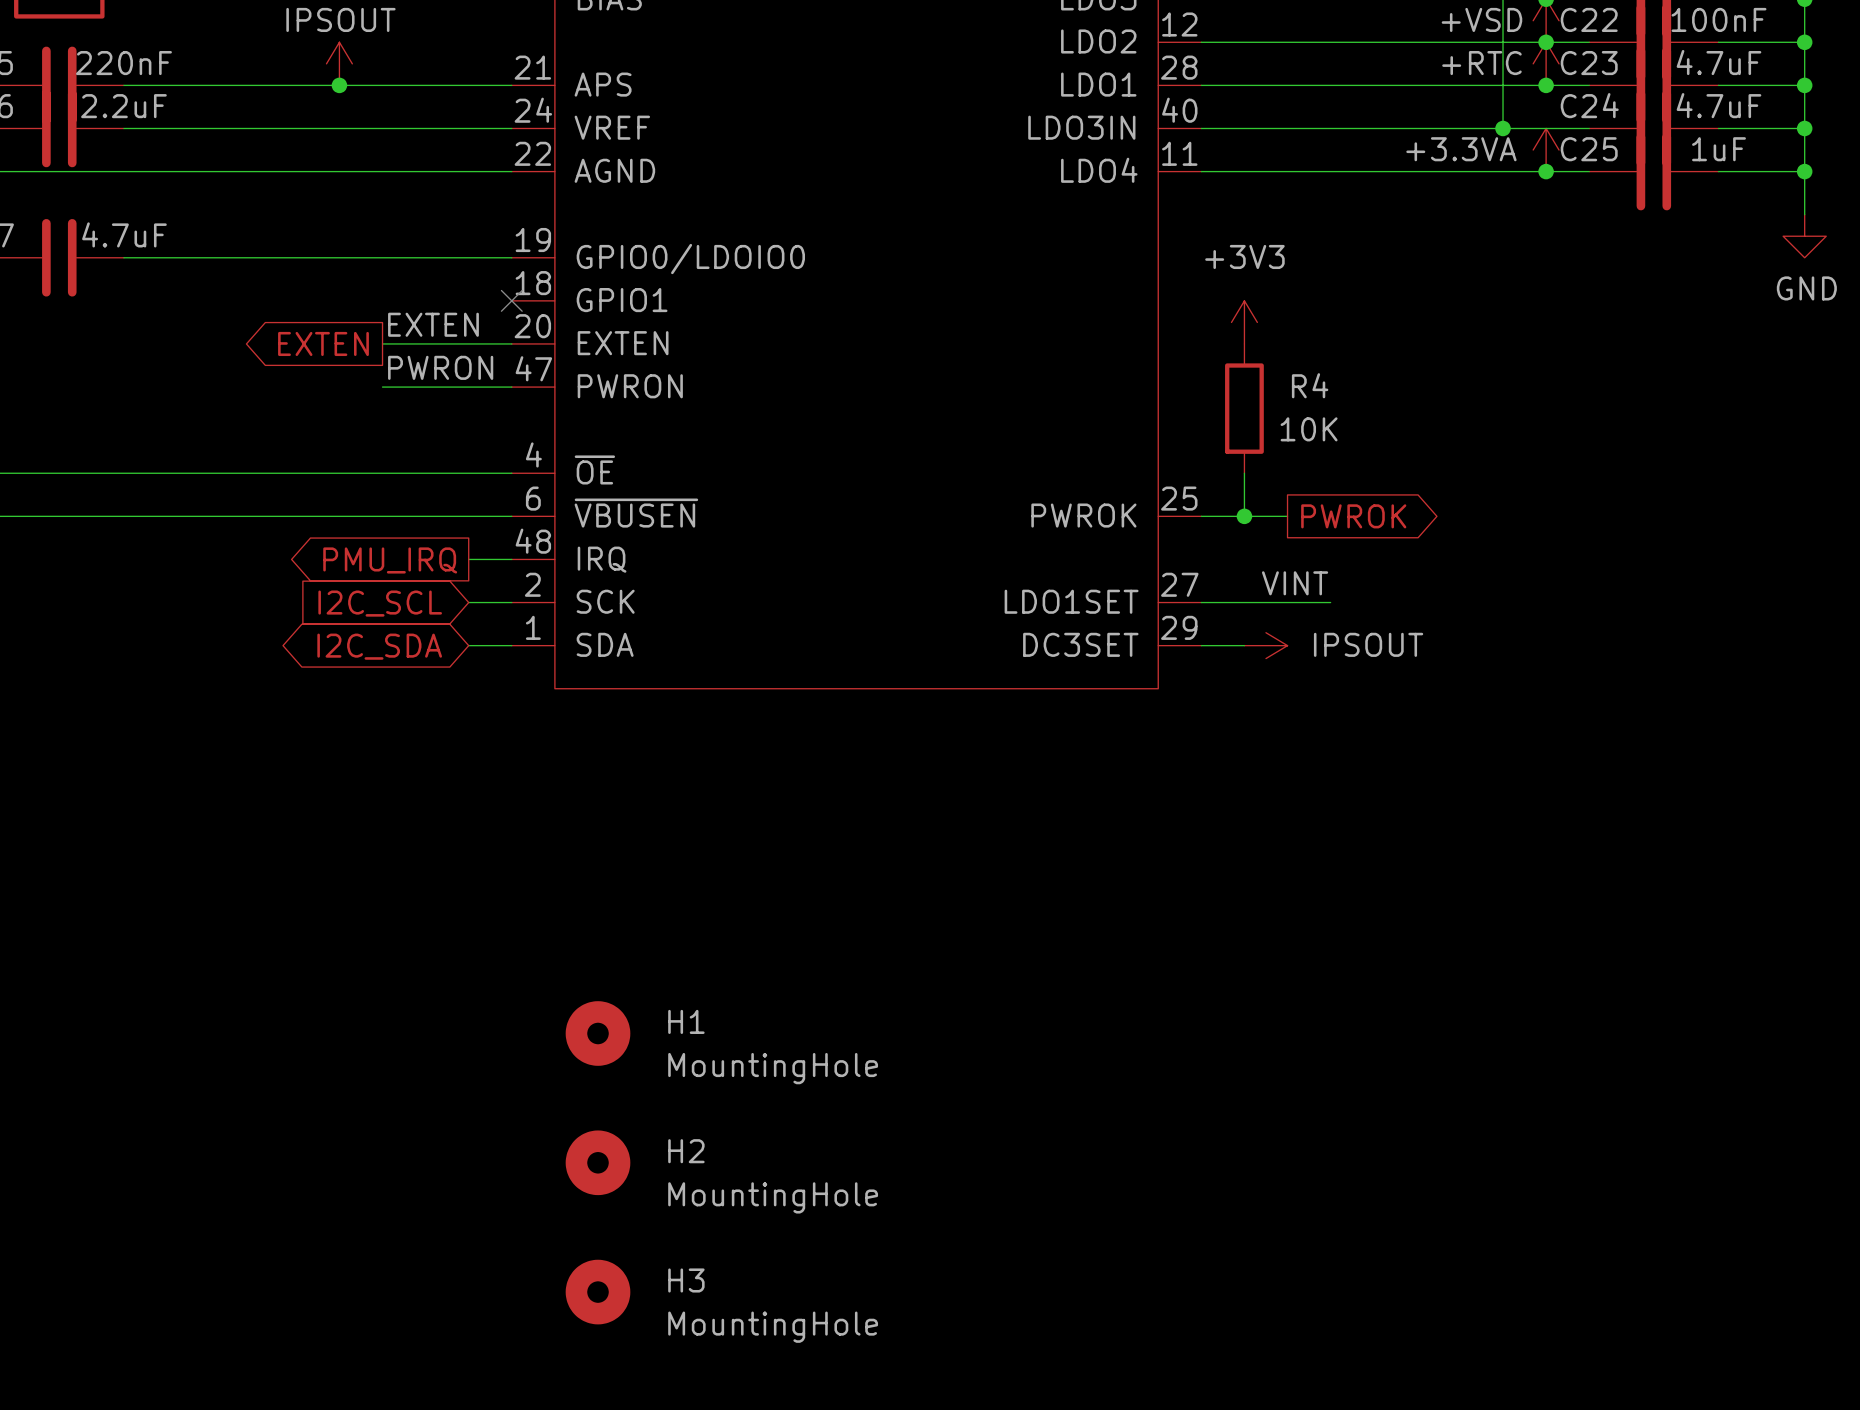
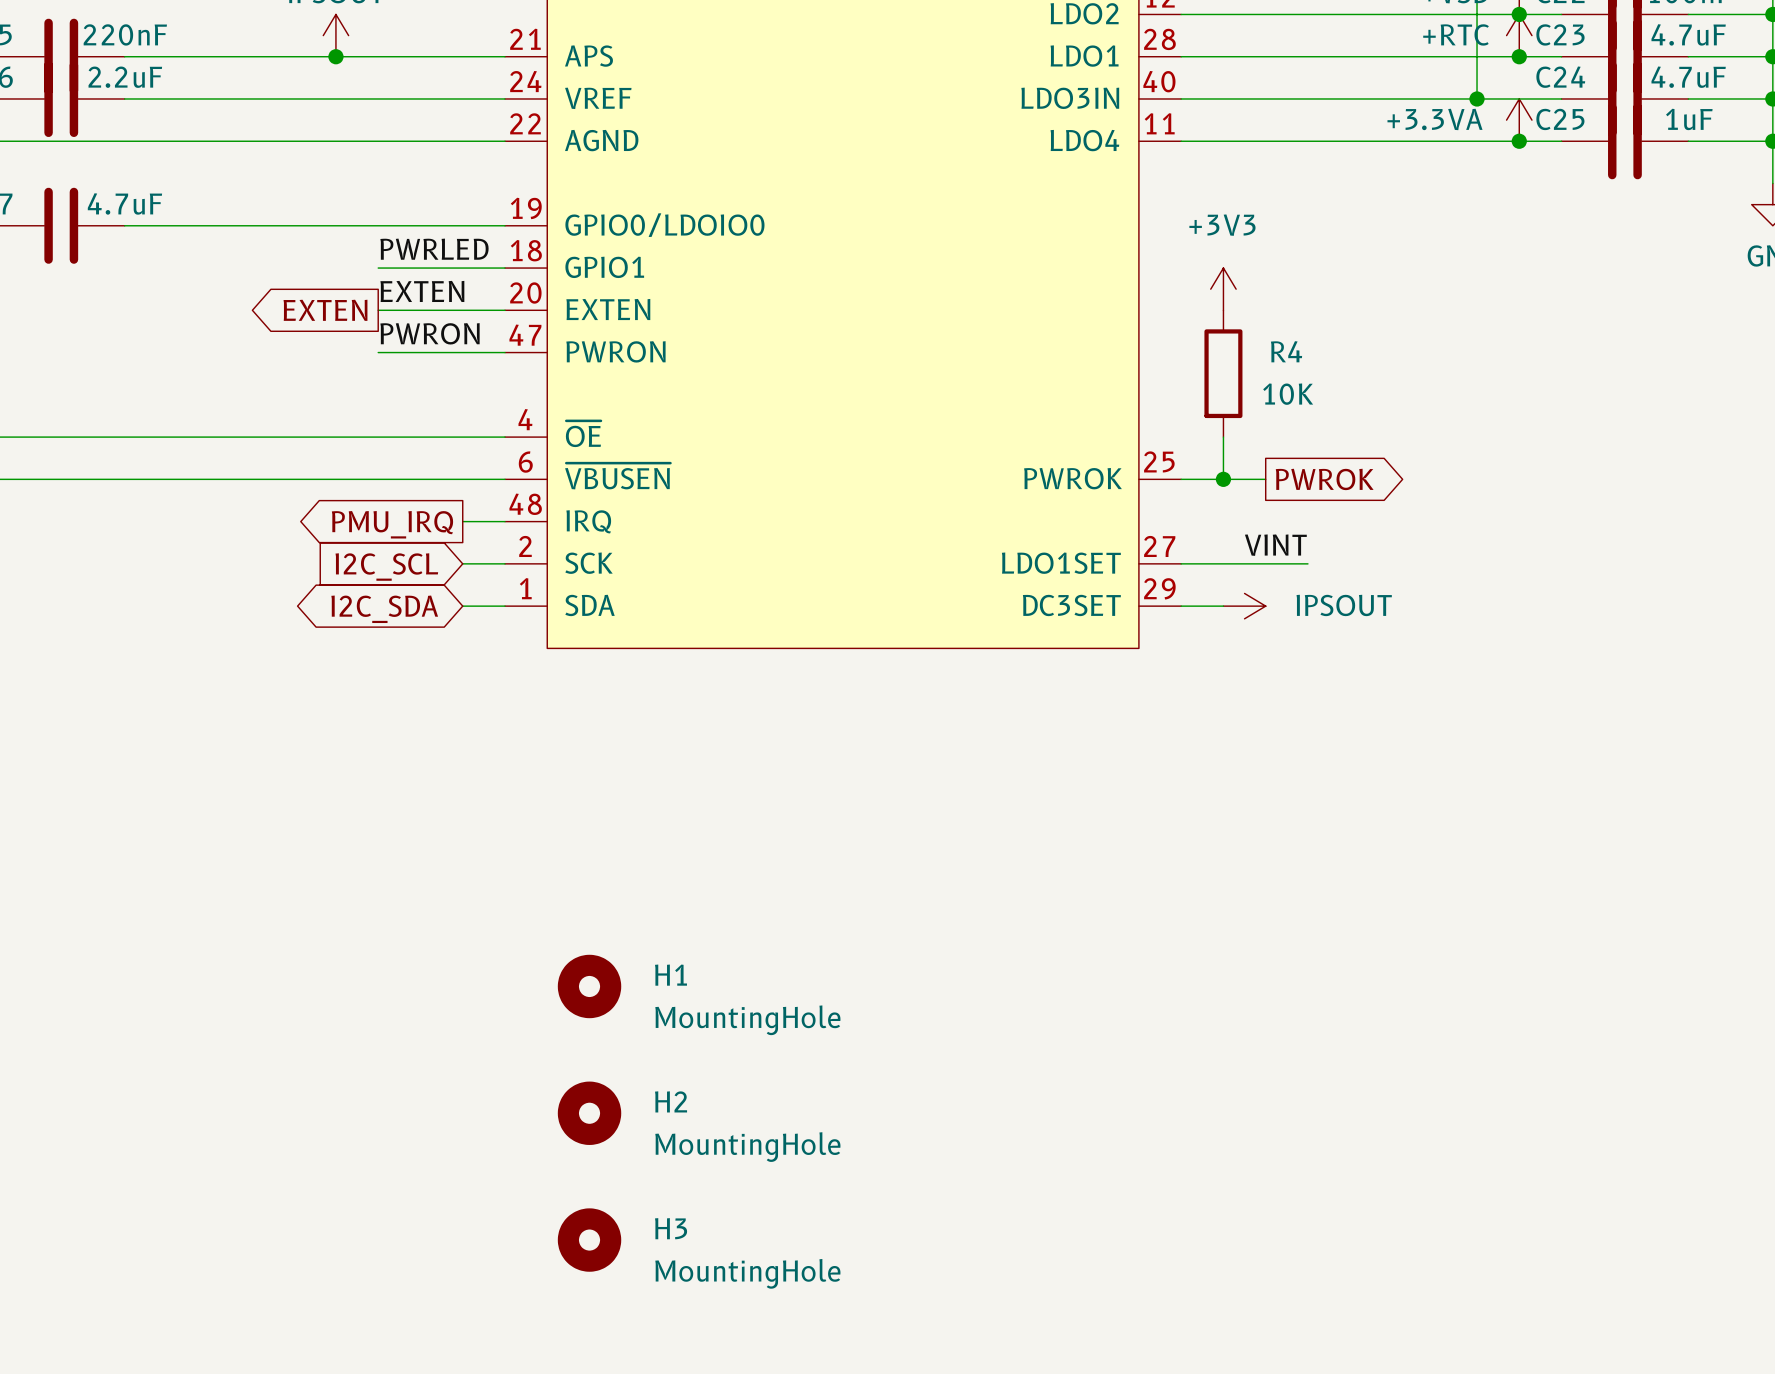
label: none -> PWRLED (434, 249)
wire: none -> (378, 268) (505, 268)
no-connect mark: (511, 300) -> none

